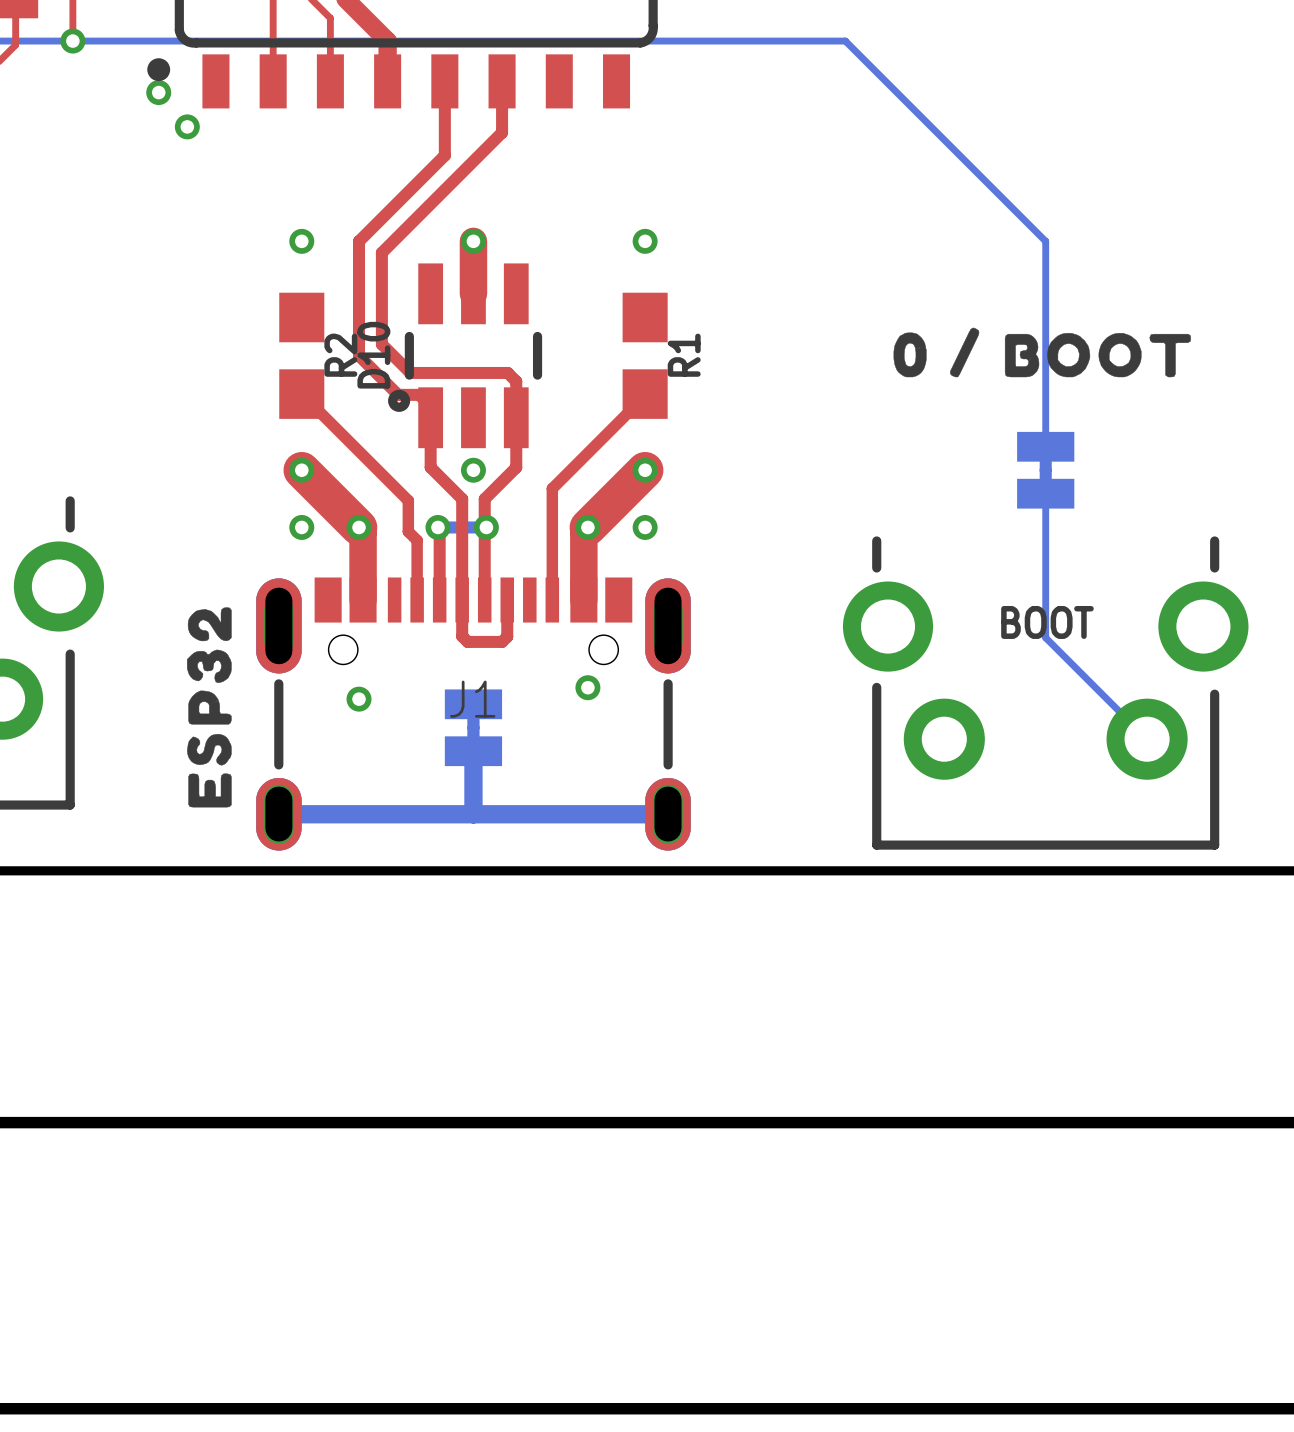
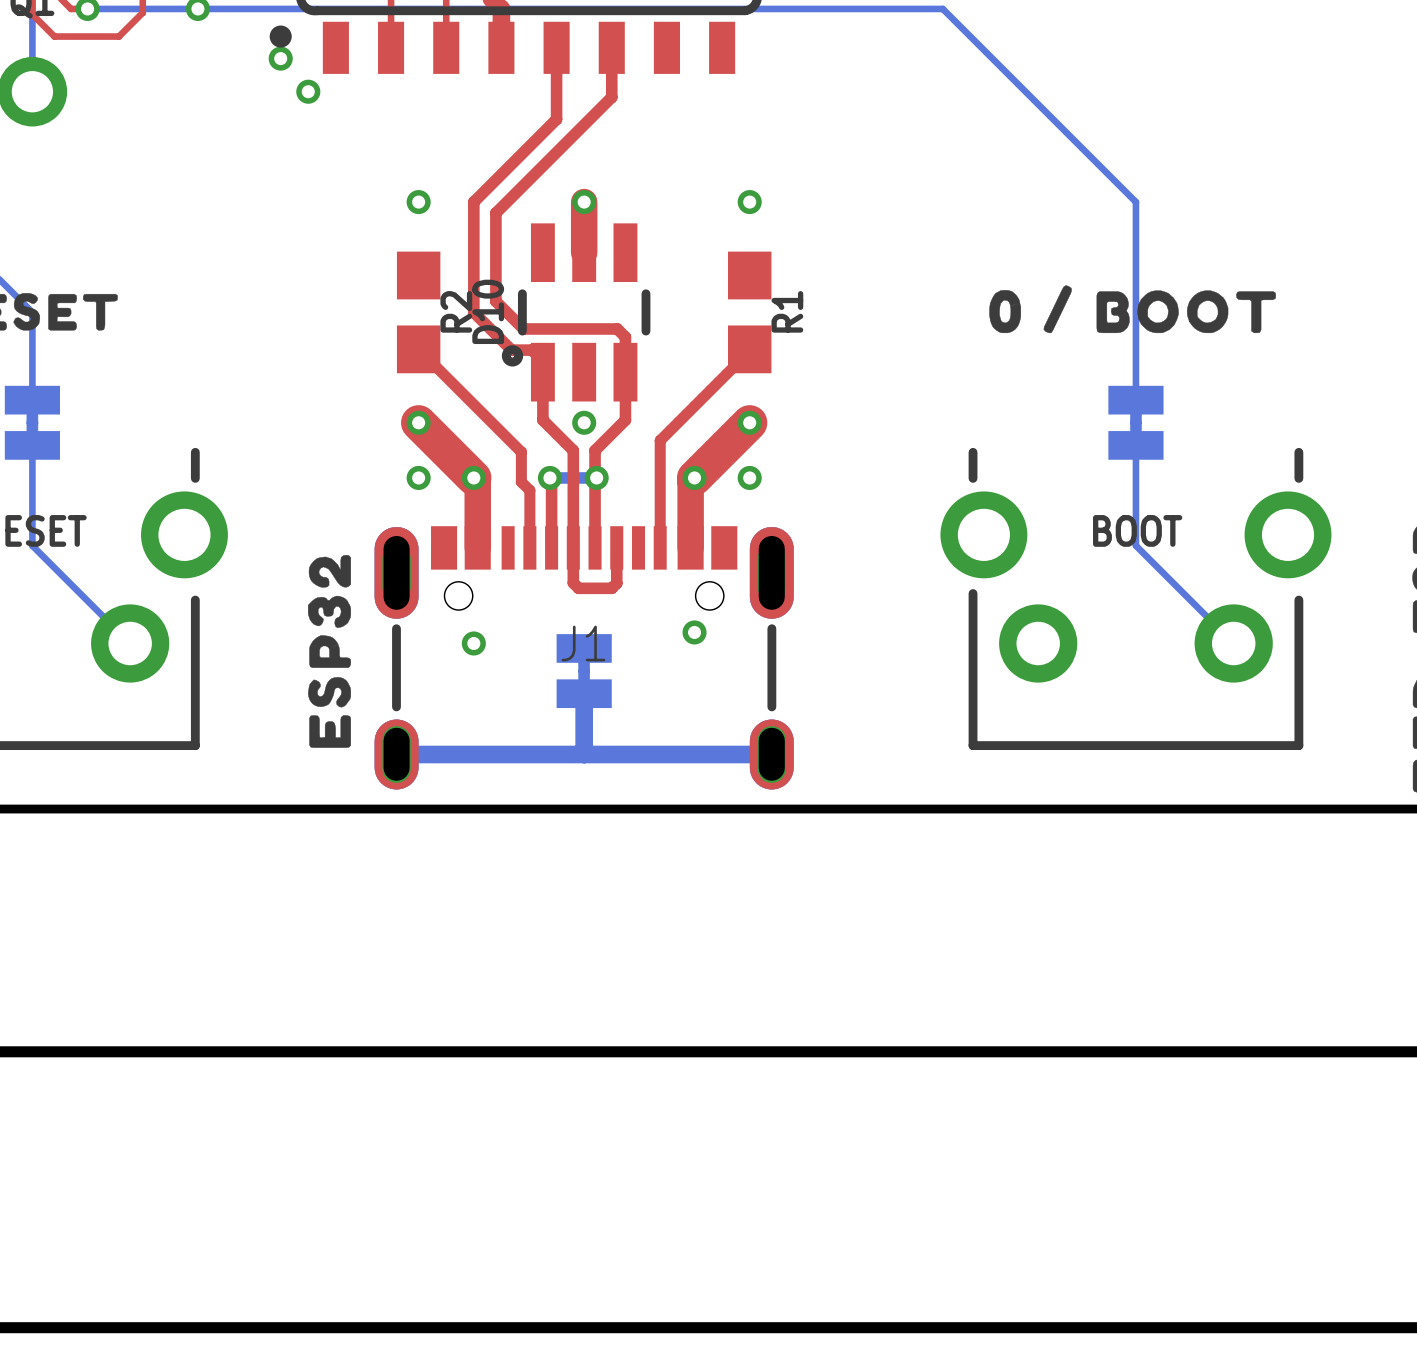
bottom track: (1045, 597) (1045, 637) (1147, 739) -> (1135, 545) (1233, 643)
BOOT position: (1045, 693) -> (1135, 598)

